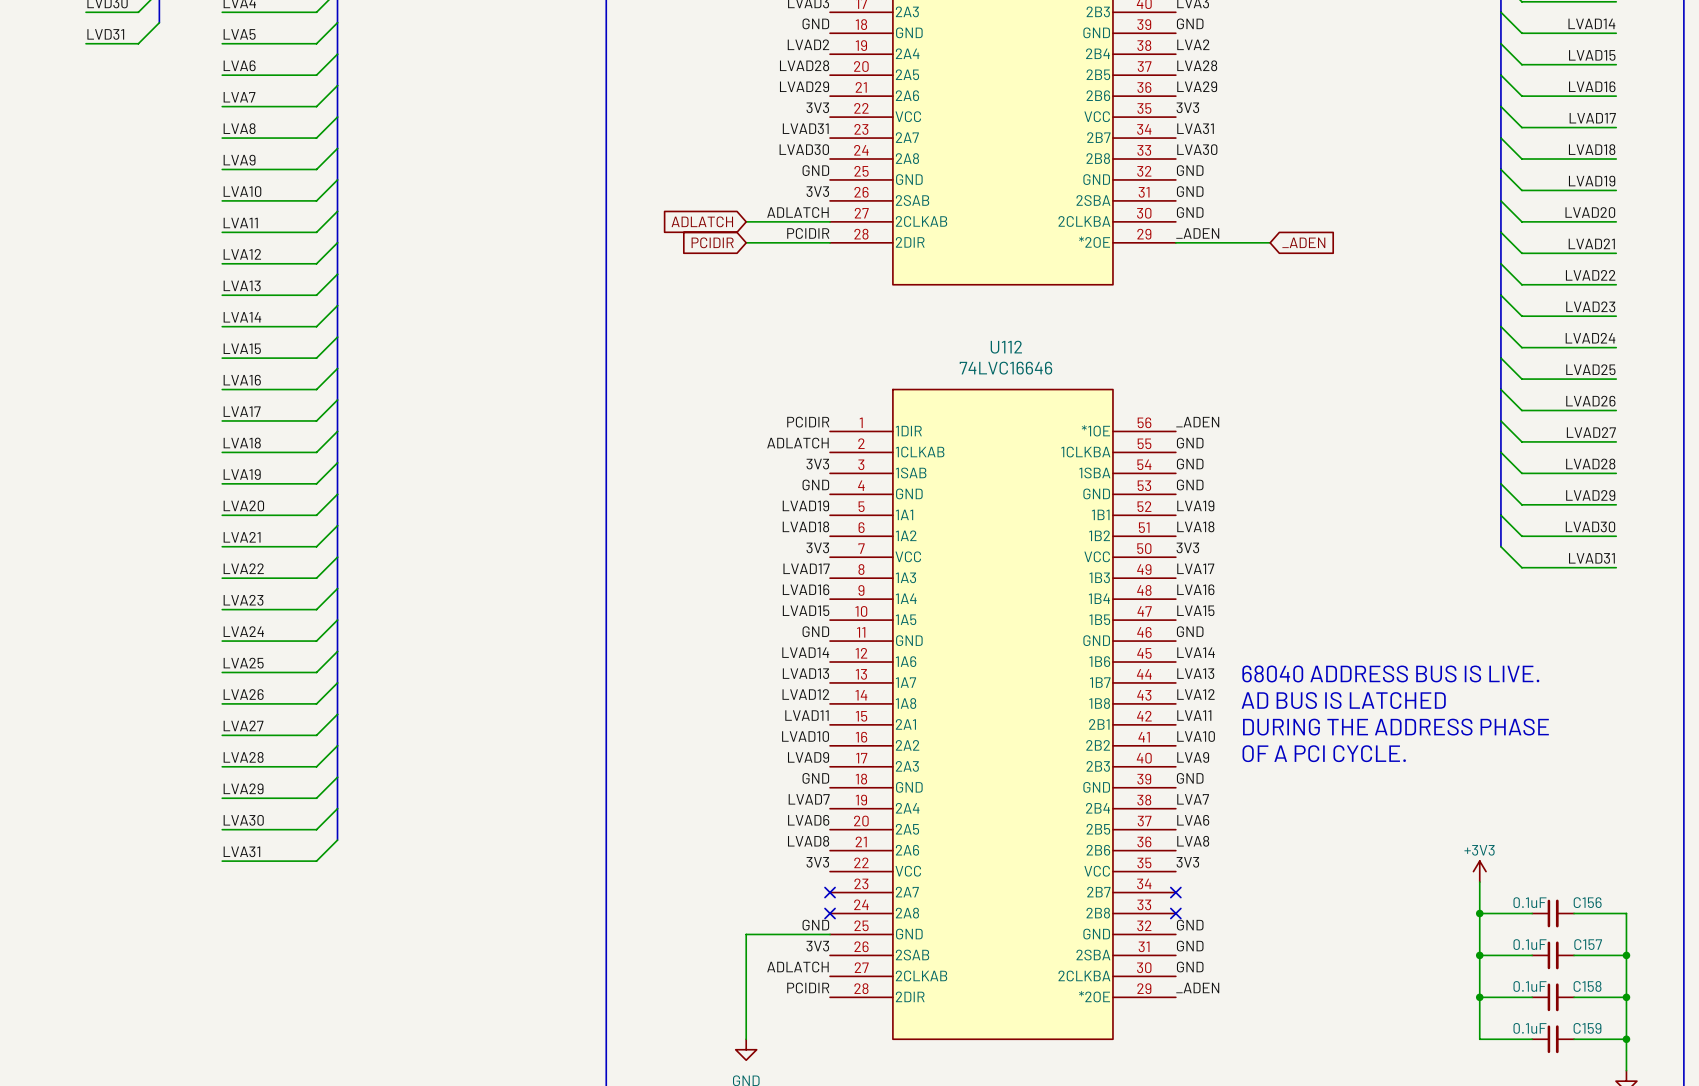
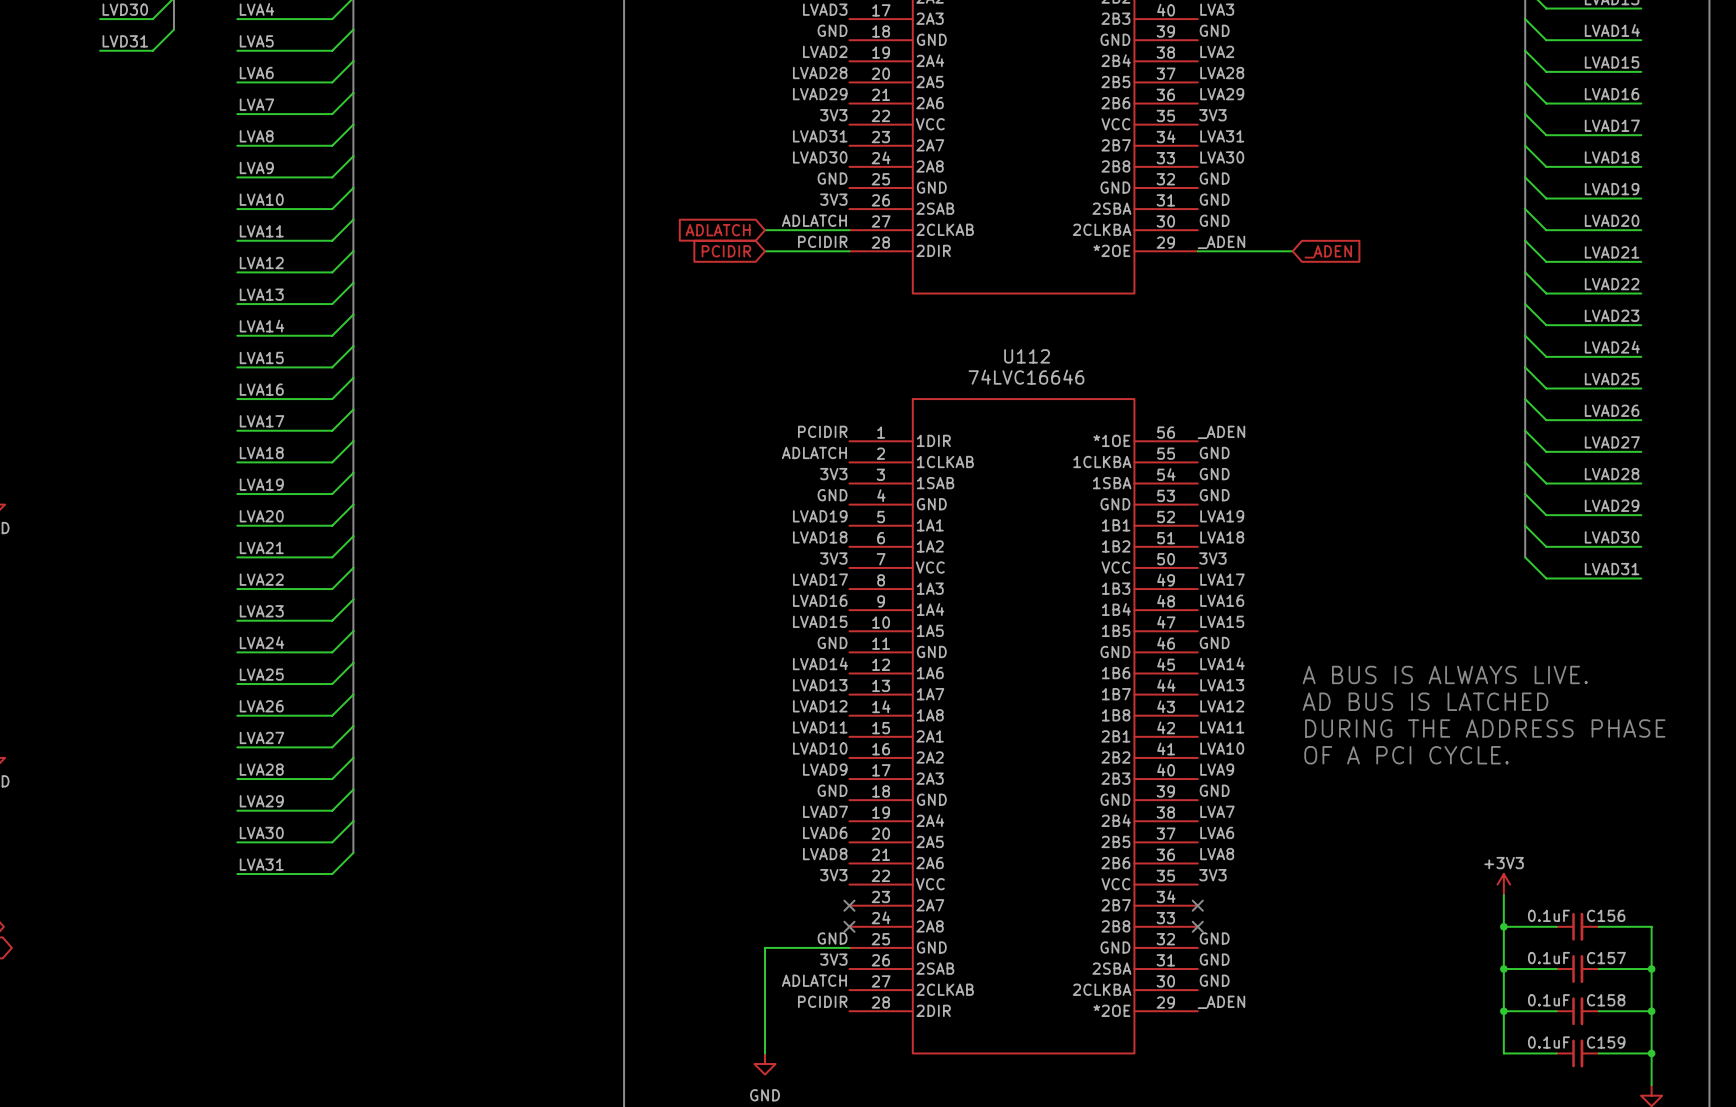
text: none -> A BUS IS ALWAYS LIVE. (1445, 674)
text: 68040 ADDRESS BUS IS LIVE. (1390, 673) -> none
text position: AD BUS IS LATCHED (1343, 700) -> AD BUS IS LATCHED (1425, 701)
text position: DURING THE ADDRESS PHASE (1395, 727) -> DURING THE ADDRESS PHASE (1485, 728)
text position: OF A PCI CYCLE. (1324, 753) -> OF A PCI CYCLE. (1406, 755)

